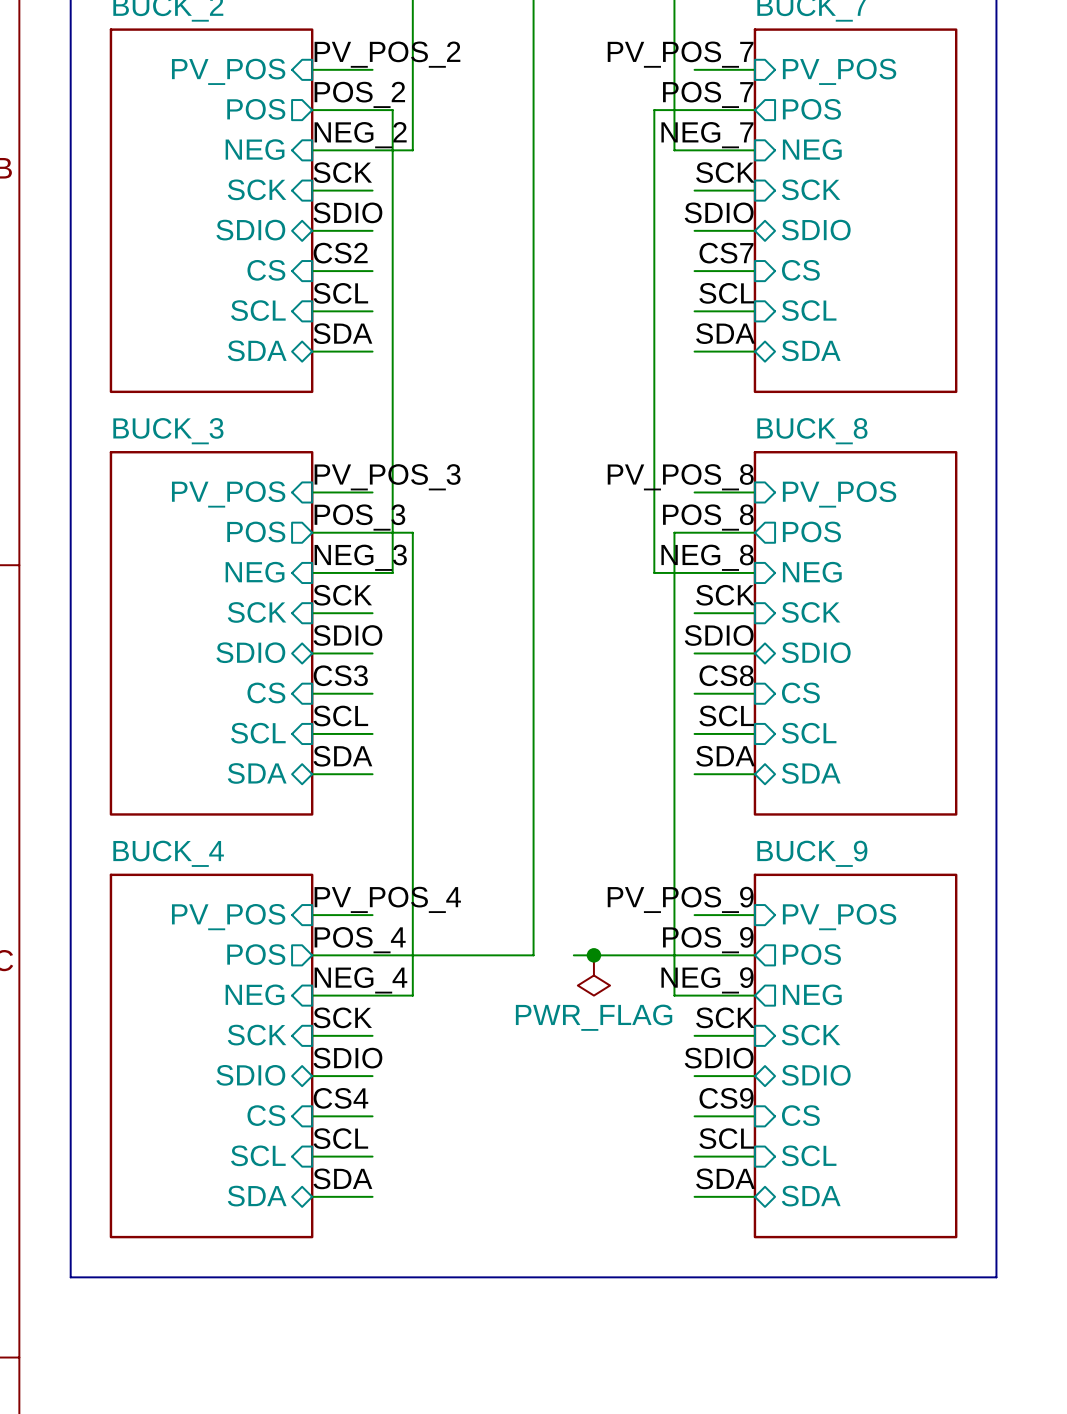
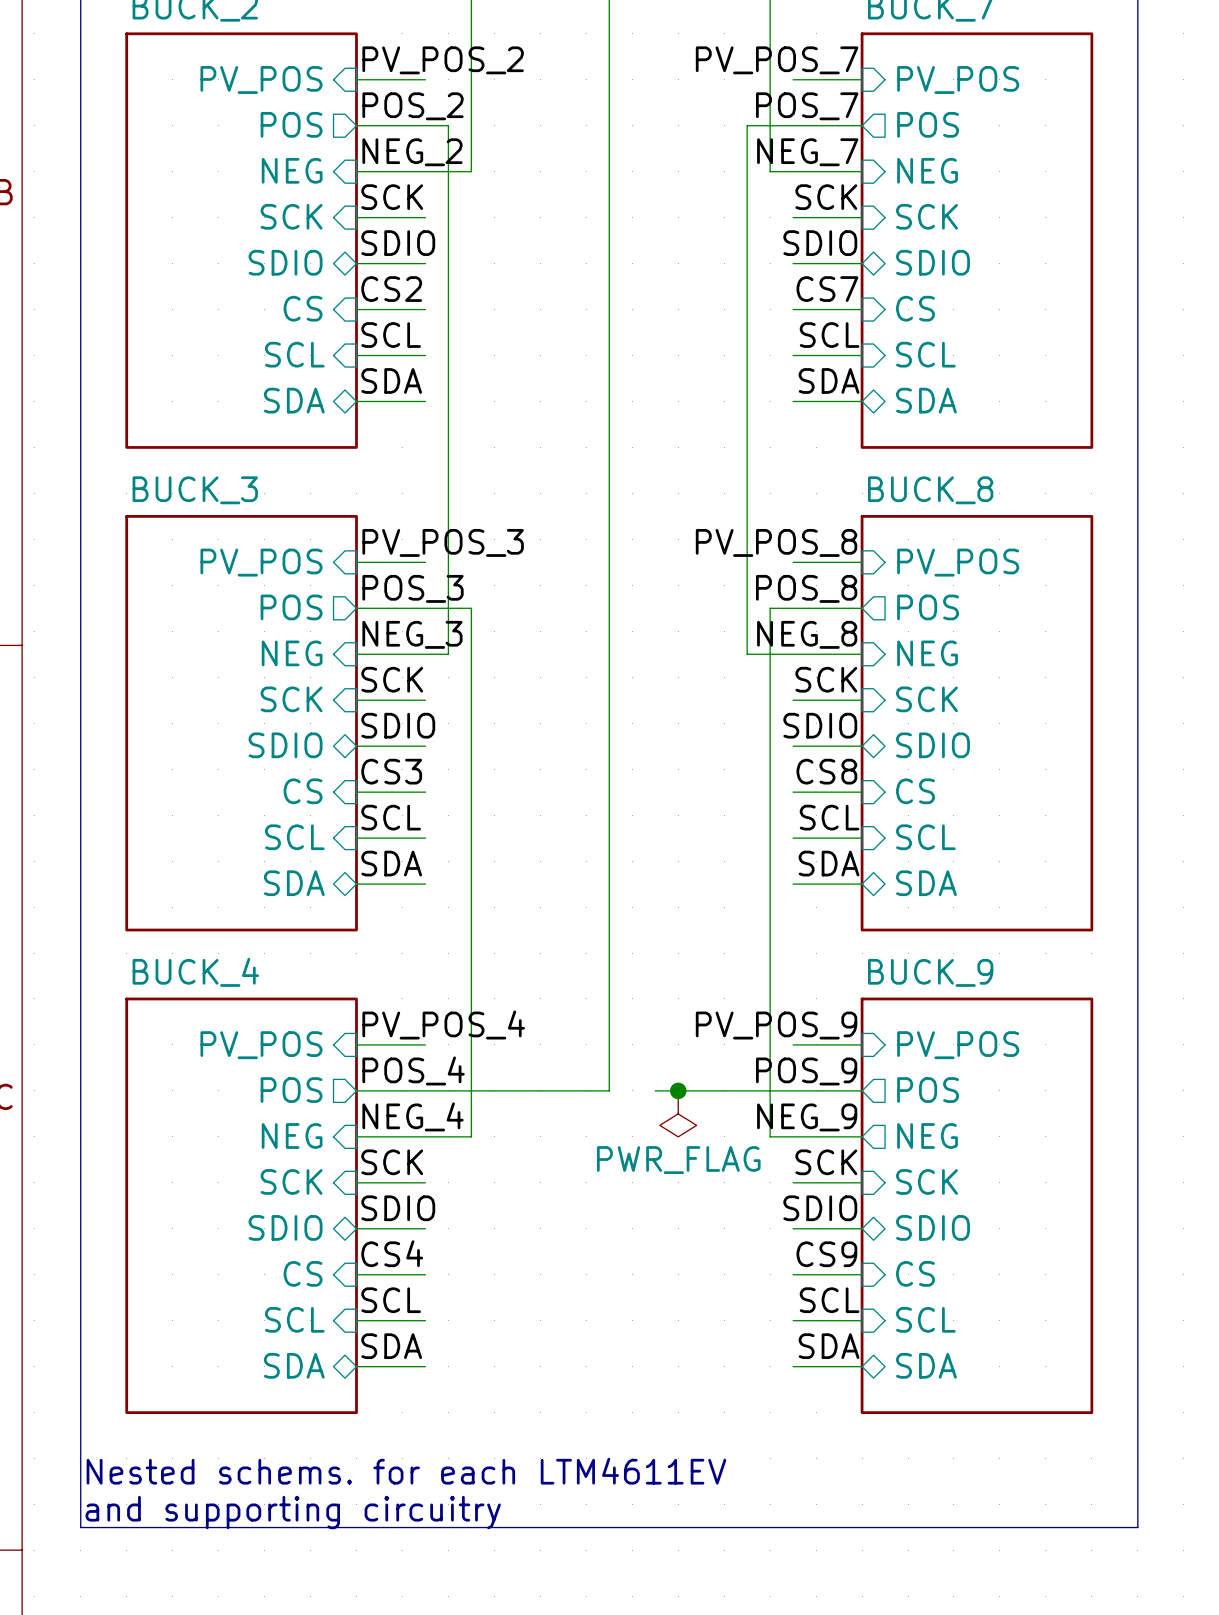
line: (70, 1277) (996, 1277) -> (80, 1458) (80, 1527) (1137, 1527) (1137, 1458)
text: none -> Nested schems. for each LTM4611EV (406, 1471)
text: none -> and supporting circuitry (293, 1512)

